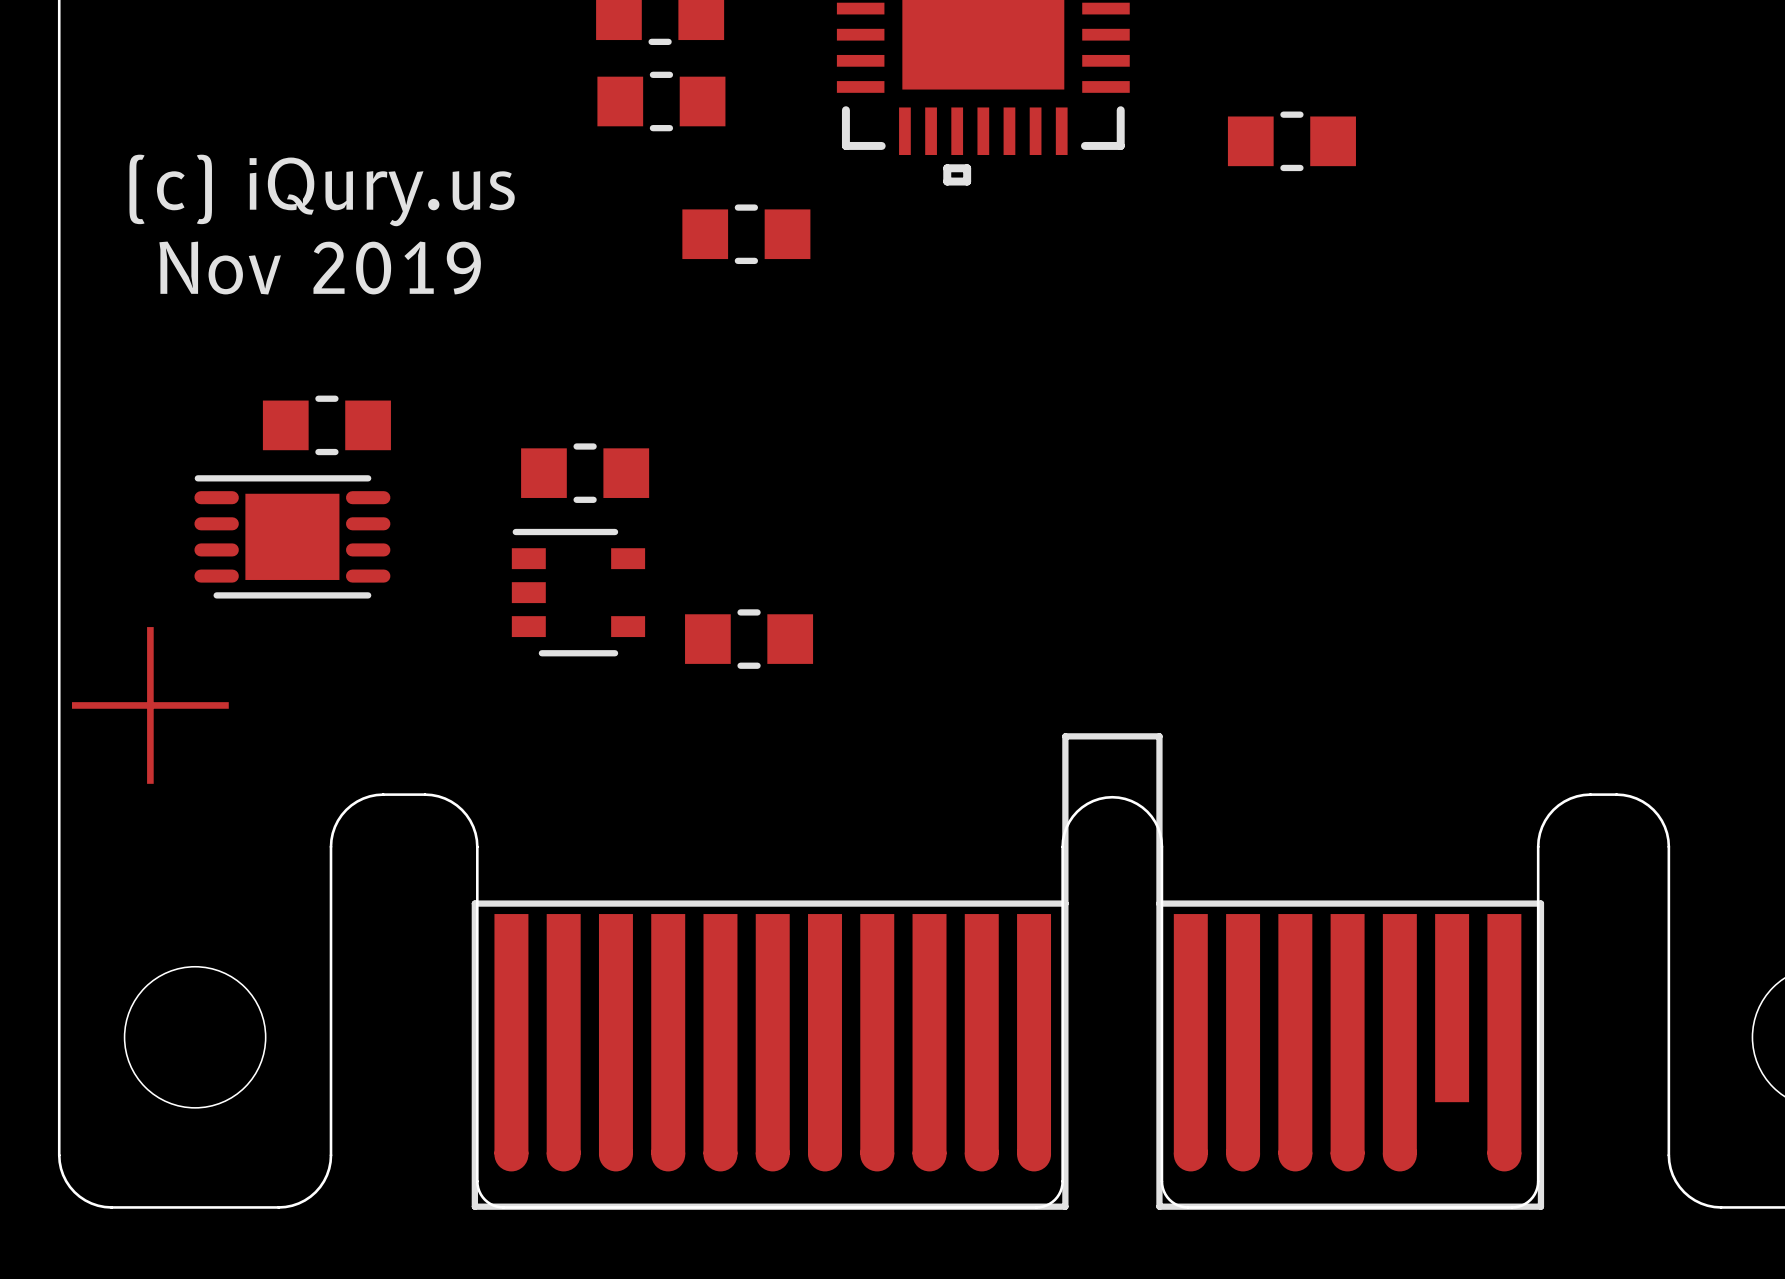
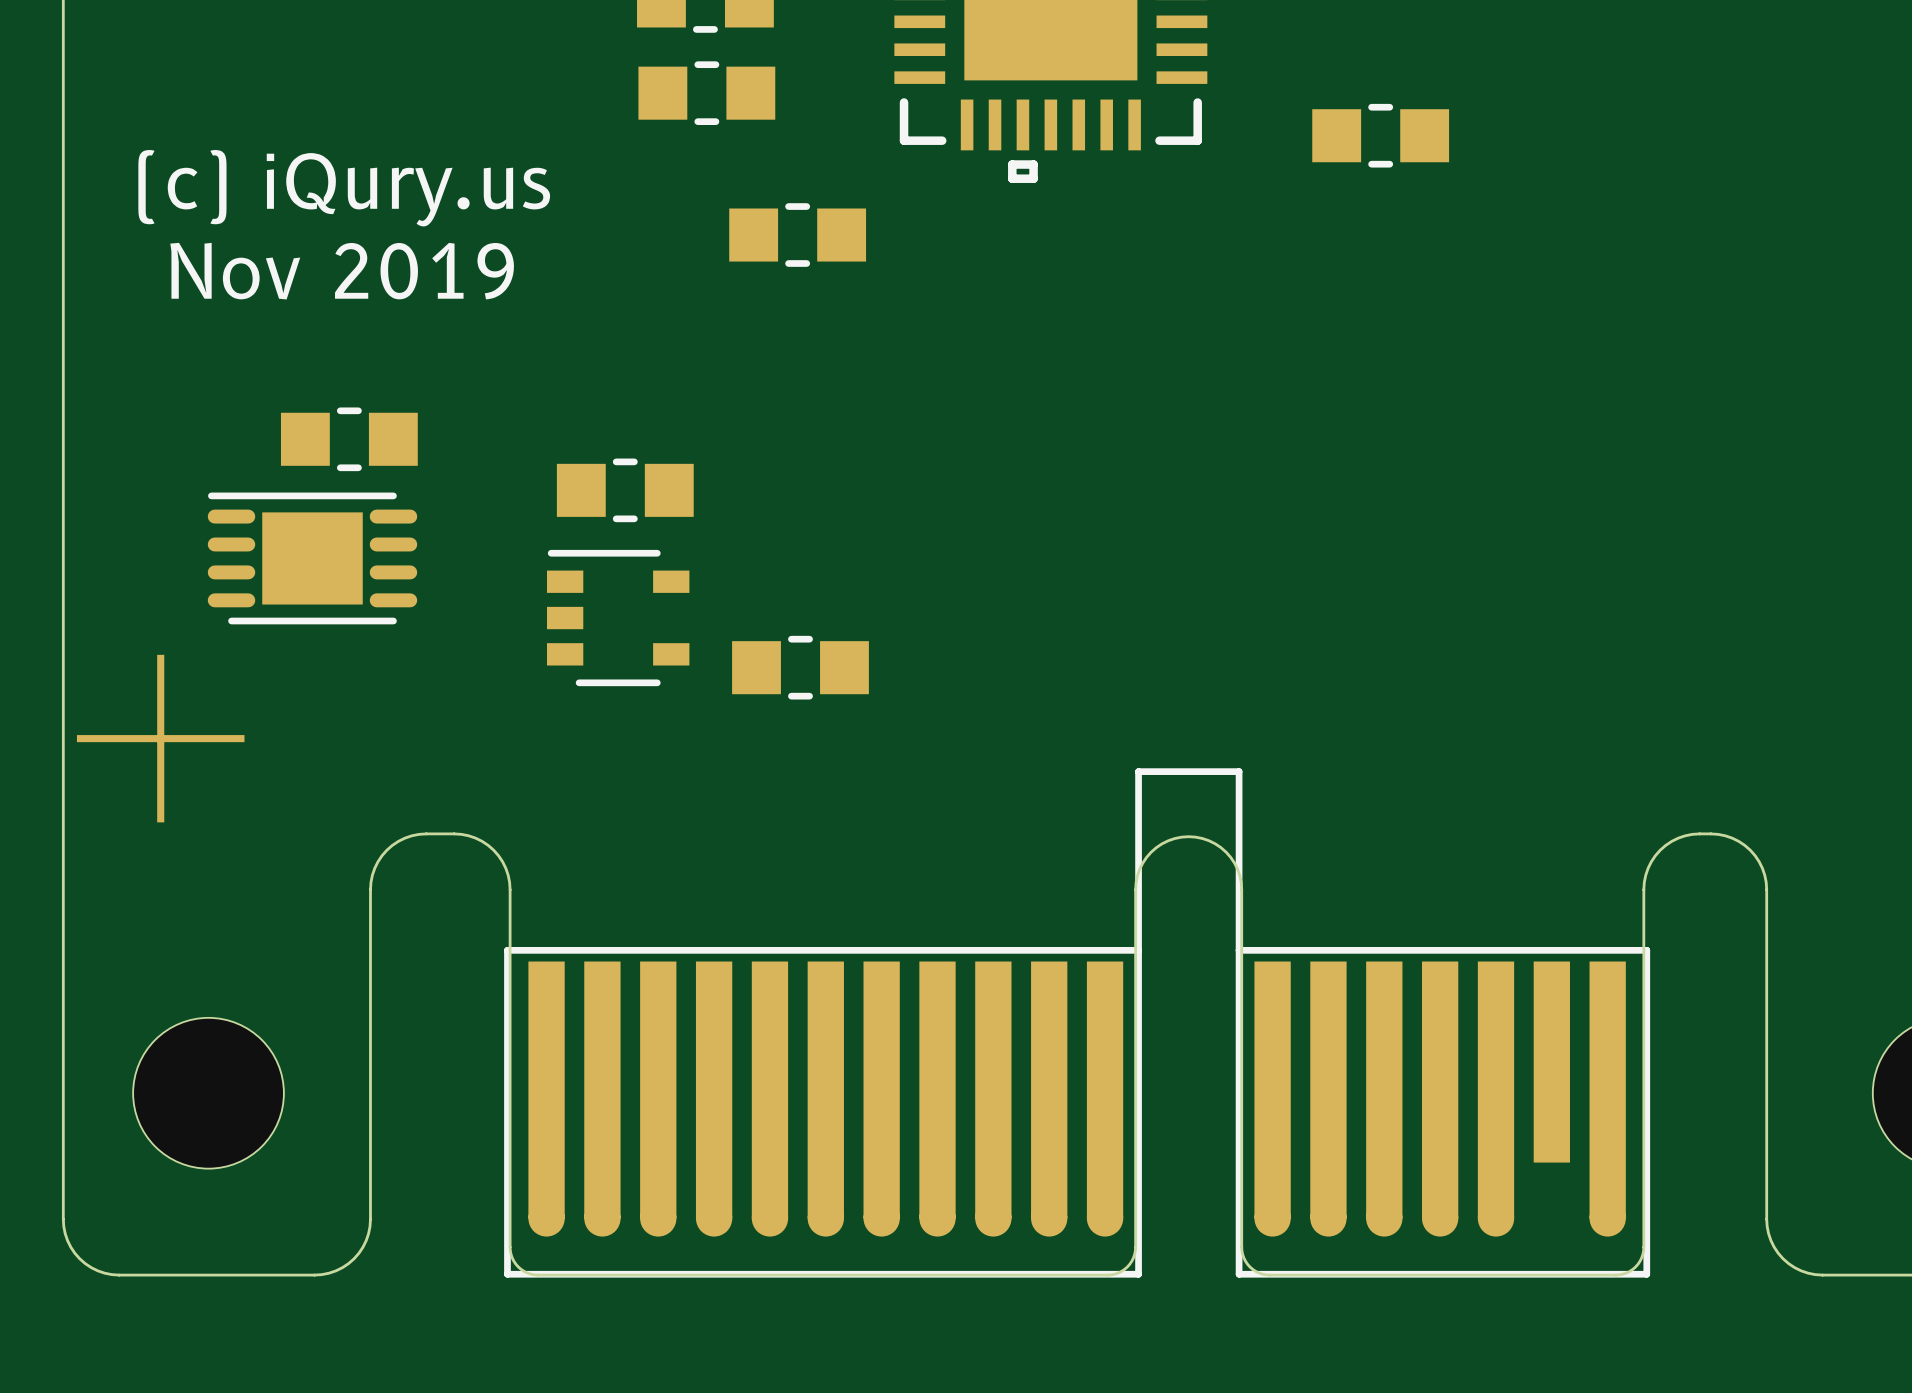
board edge: (398, 794) (376, 795) (357, 801) (341, 815) (332, 833) (330, 846) (330, 1162) (327, 1175) (315, 1192) (298, 1203) (278, 1207) -> (426, 833) (404, 838) (386, 850) (374, 868) (370, 882) (370, 1219) (368, 1233) (358, 1253) (342, 1267) (321, 1274) (297, 1275)
board edge: (1600, 794) (1623, 795) (1642, 801) (1658, 815) (1667, 833) (1668, 846) (1669, 1162) (1675, 1181) (1684, 1192) (1701, 1203) (1721, 1207) -> (1710, 833) (1732, 838) (1750, 850) (1759, 861) (1766, 882) (1766, 1219) (1768, 1233) (1778, 1253) (1794, 1267) (1815, 1274) (1839, 1275)

